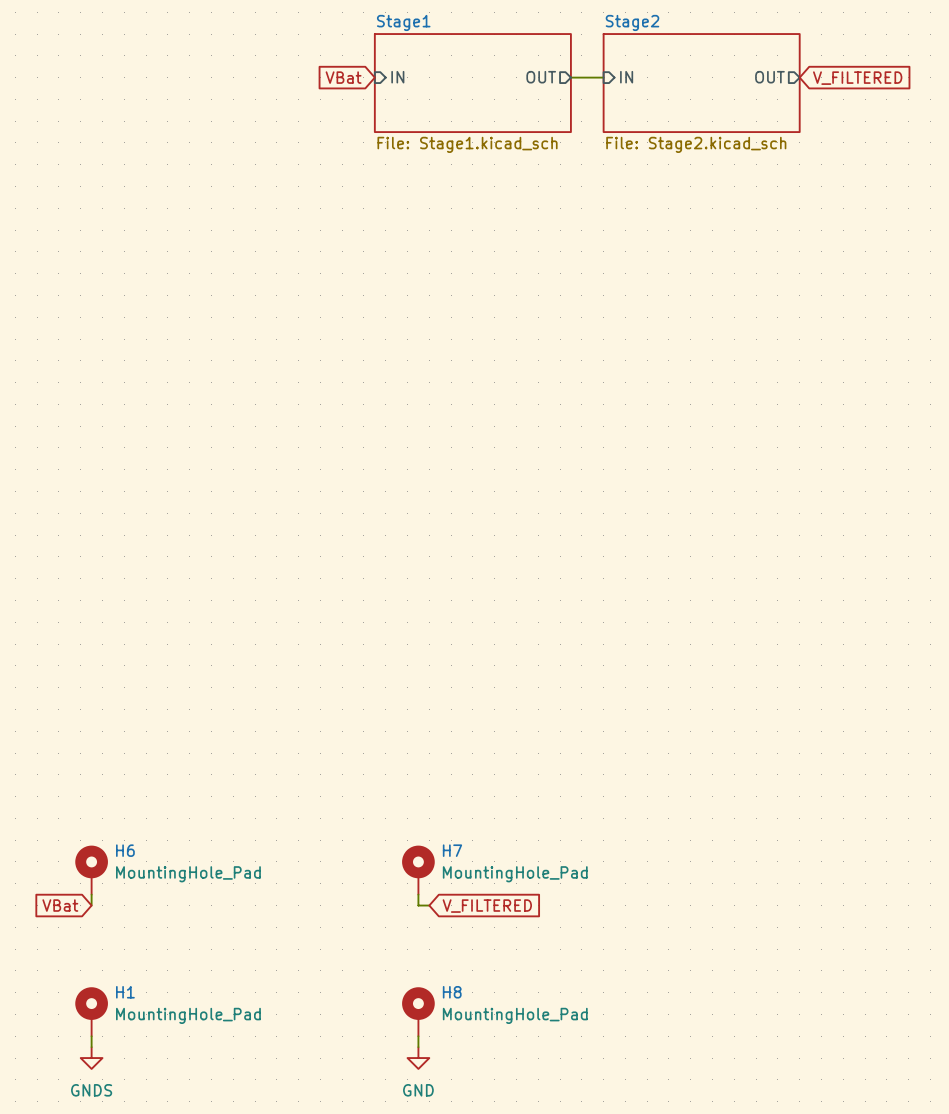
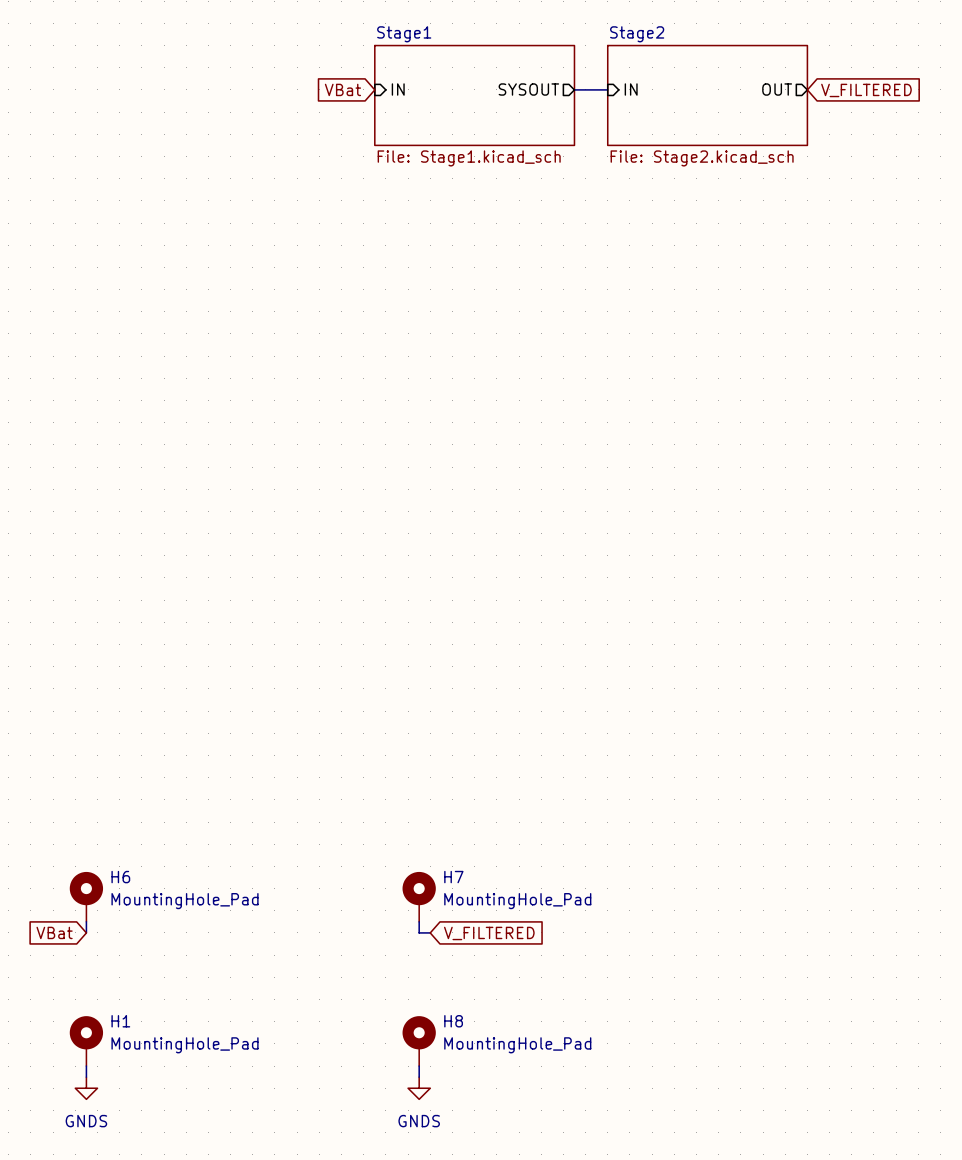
sheet pin: OUT (541, 77) -> SYSOUT (528, 89)
power symbol: GND (418, 1058) -> GNDS (419, 1088)

